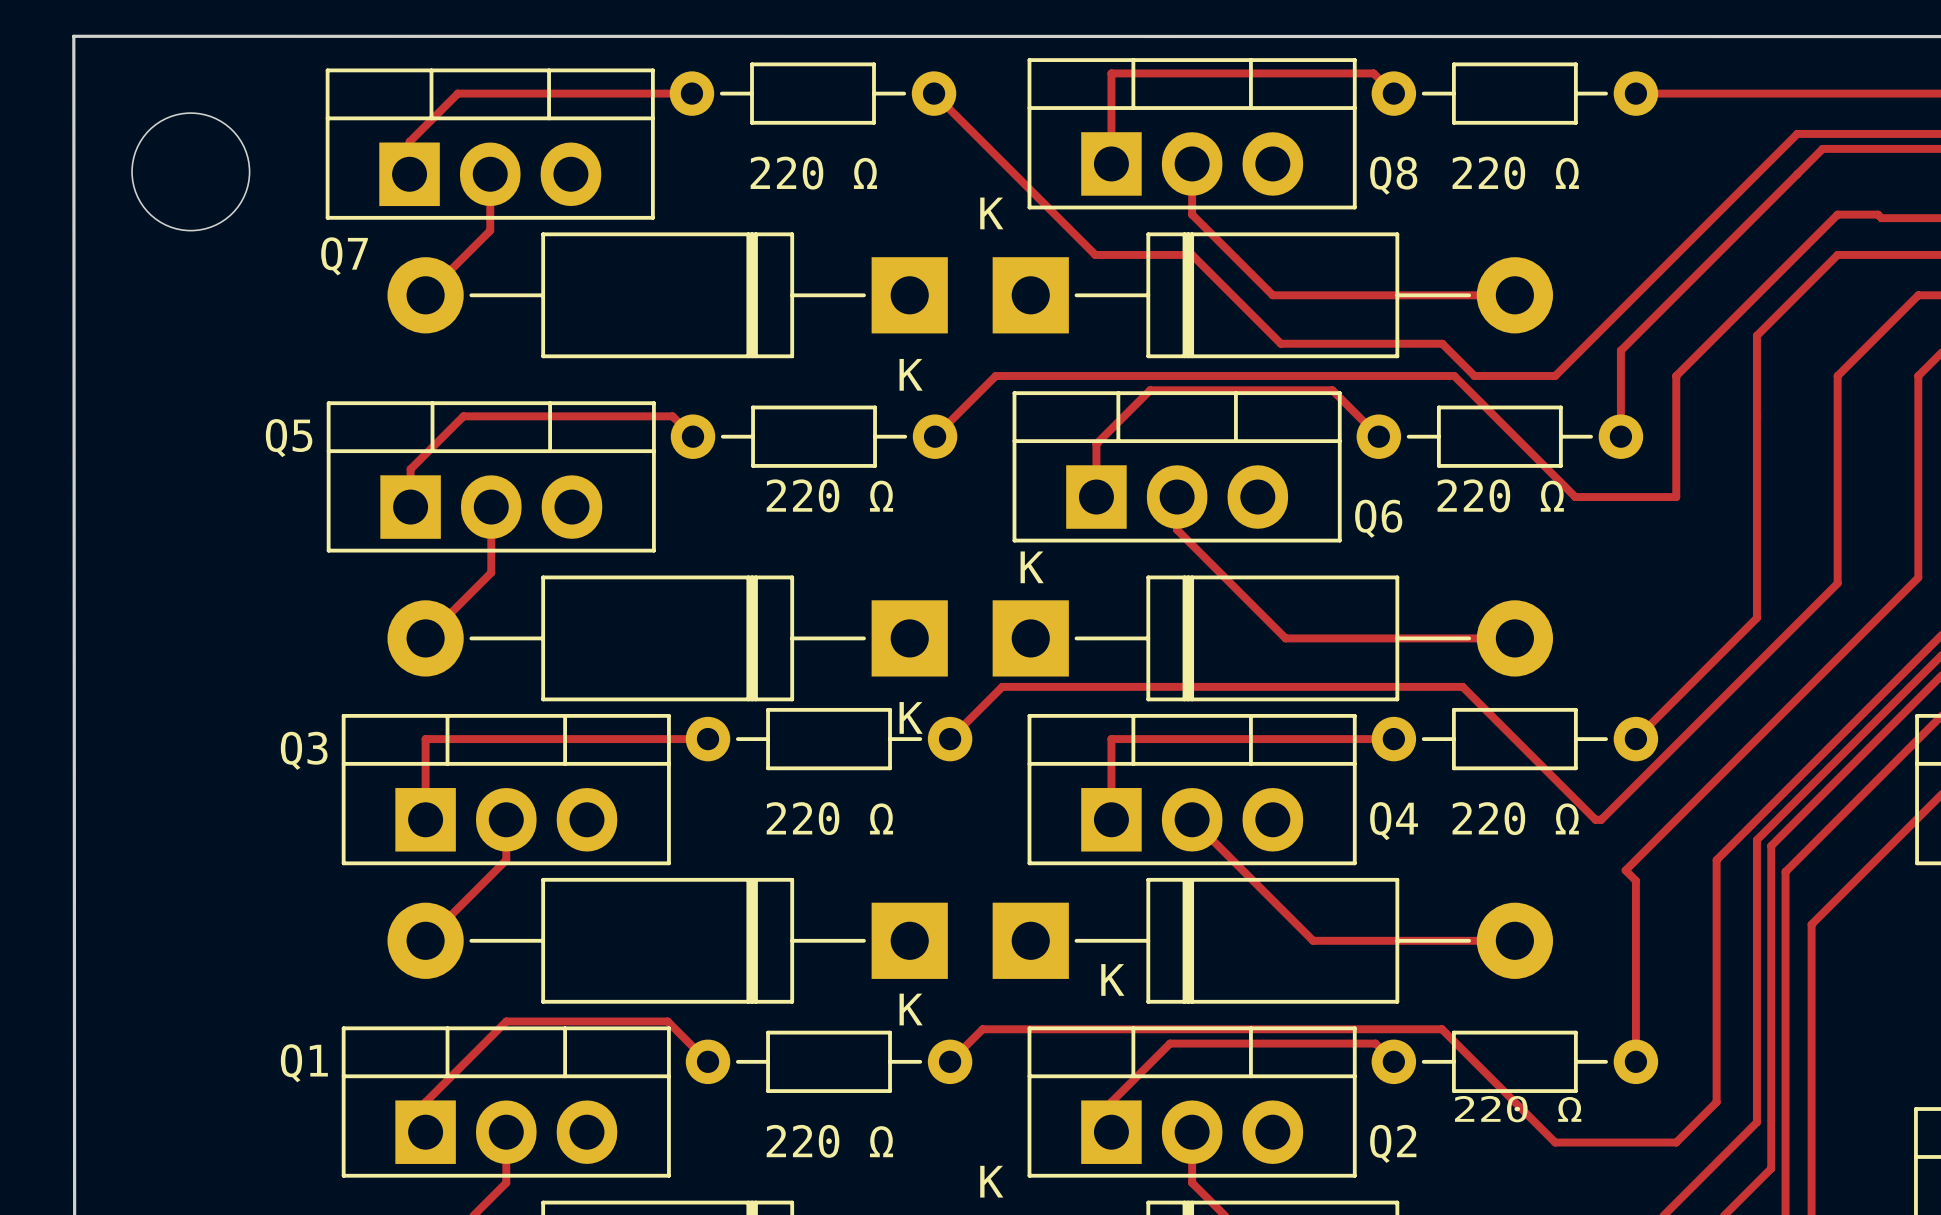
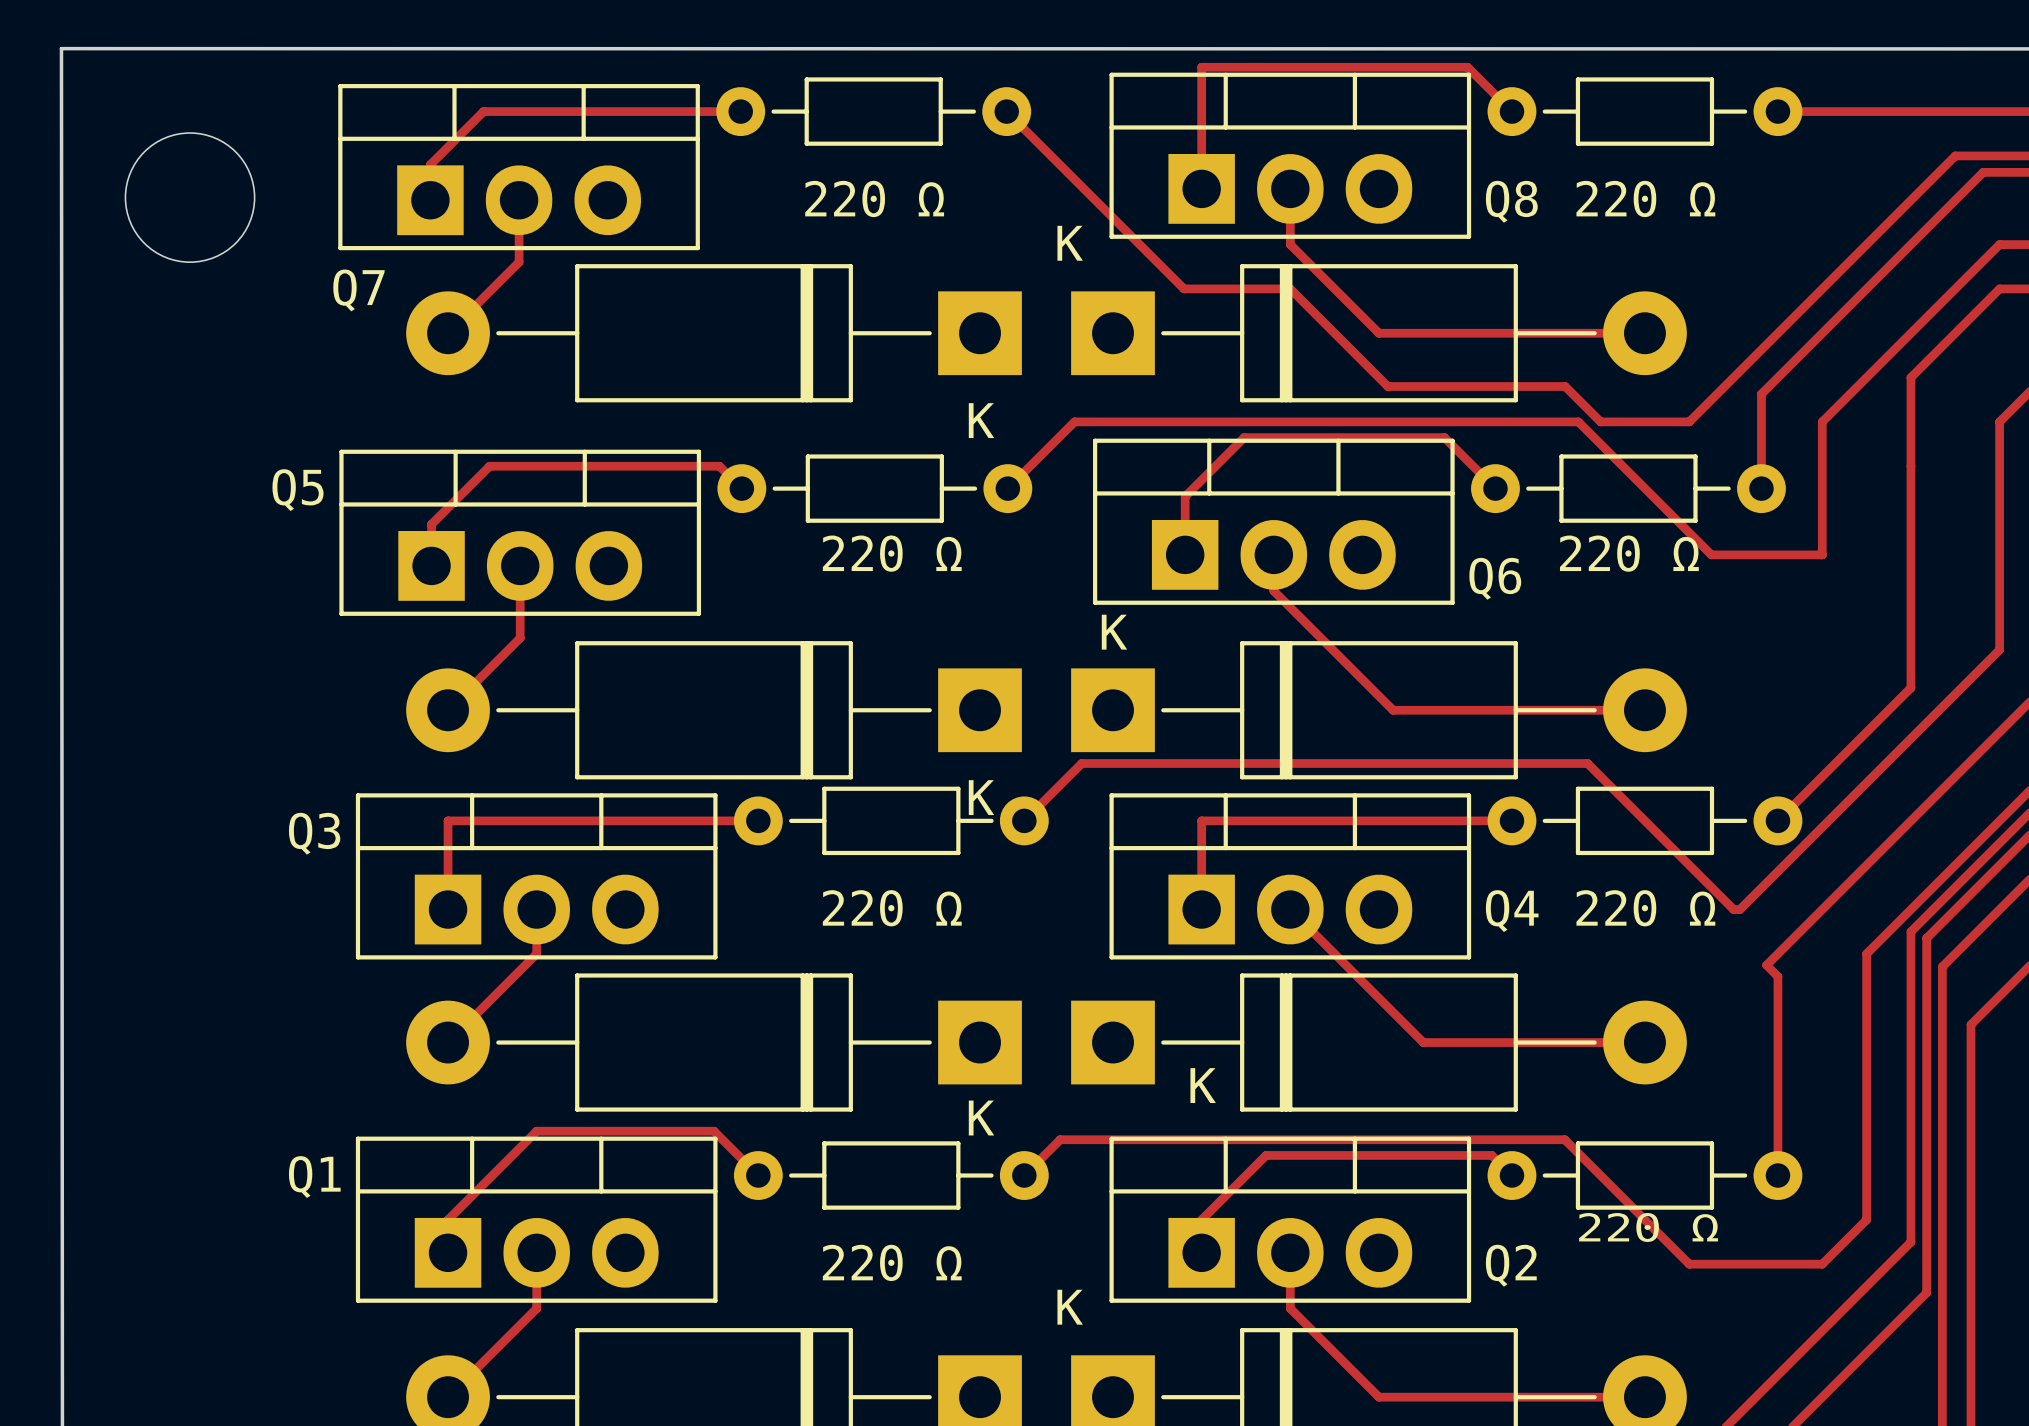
track: (1111, 73) (1373, 73) -> (1201, 89) (1201, 67) (1467, 67) (1489, 89)

